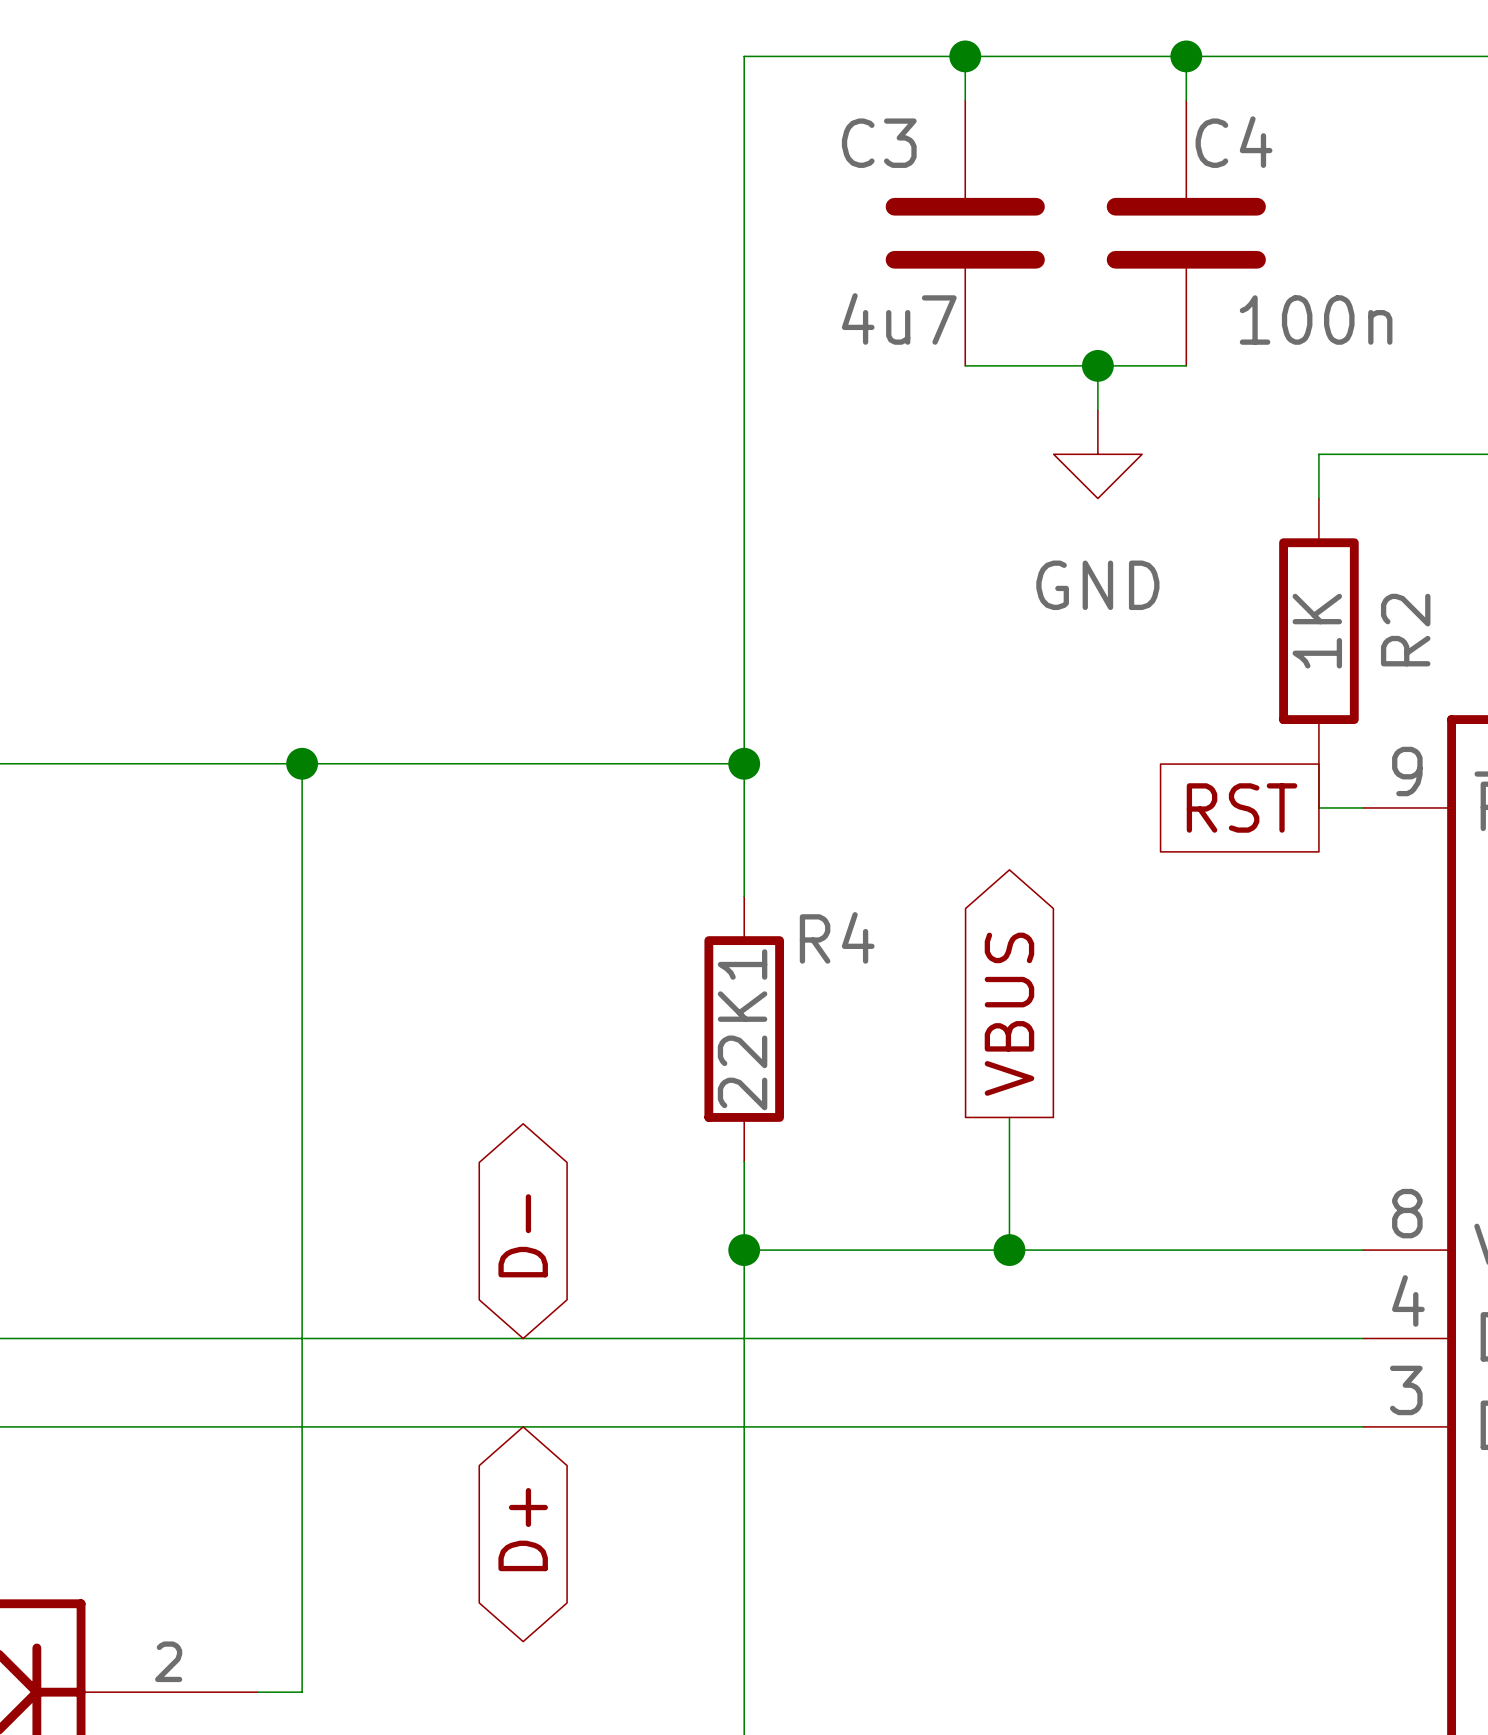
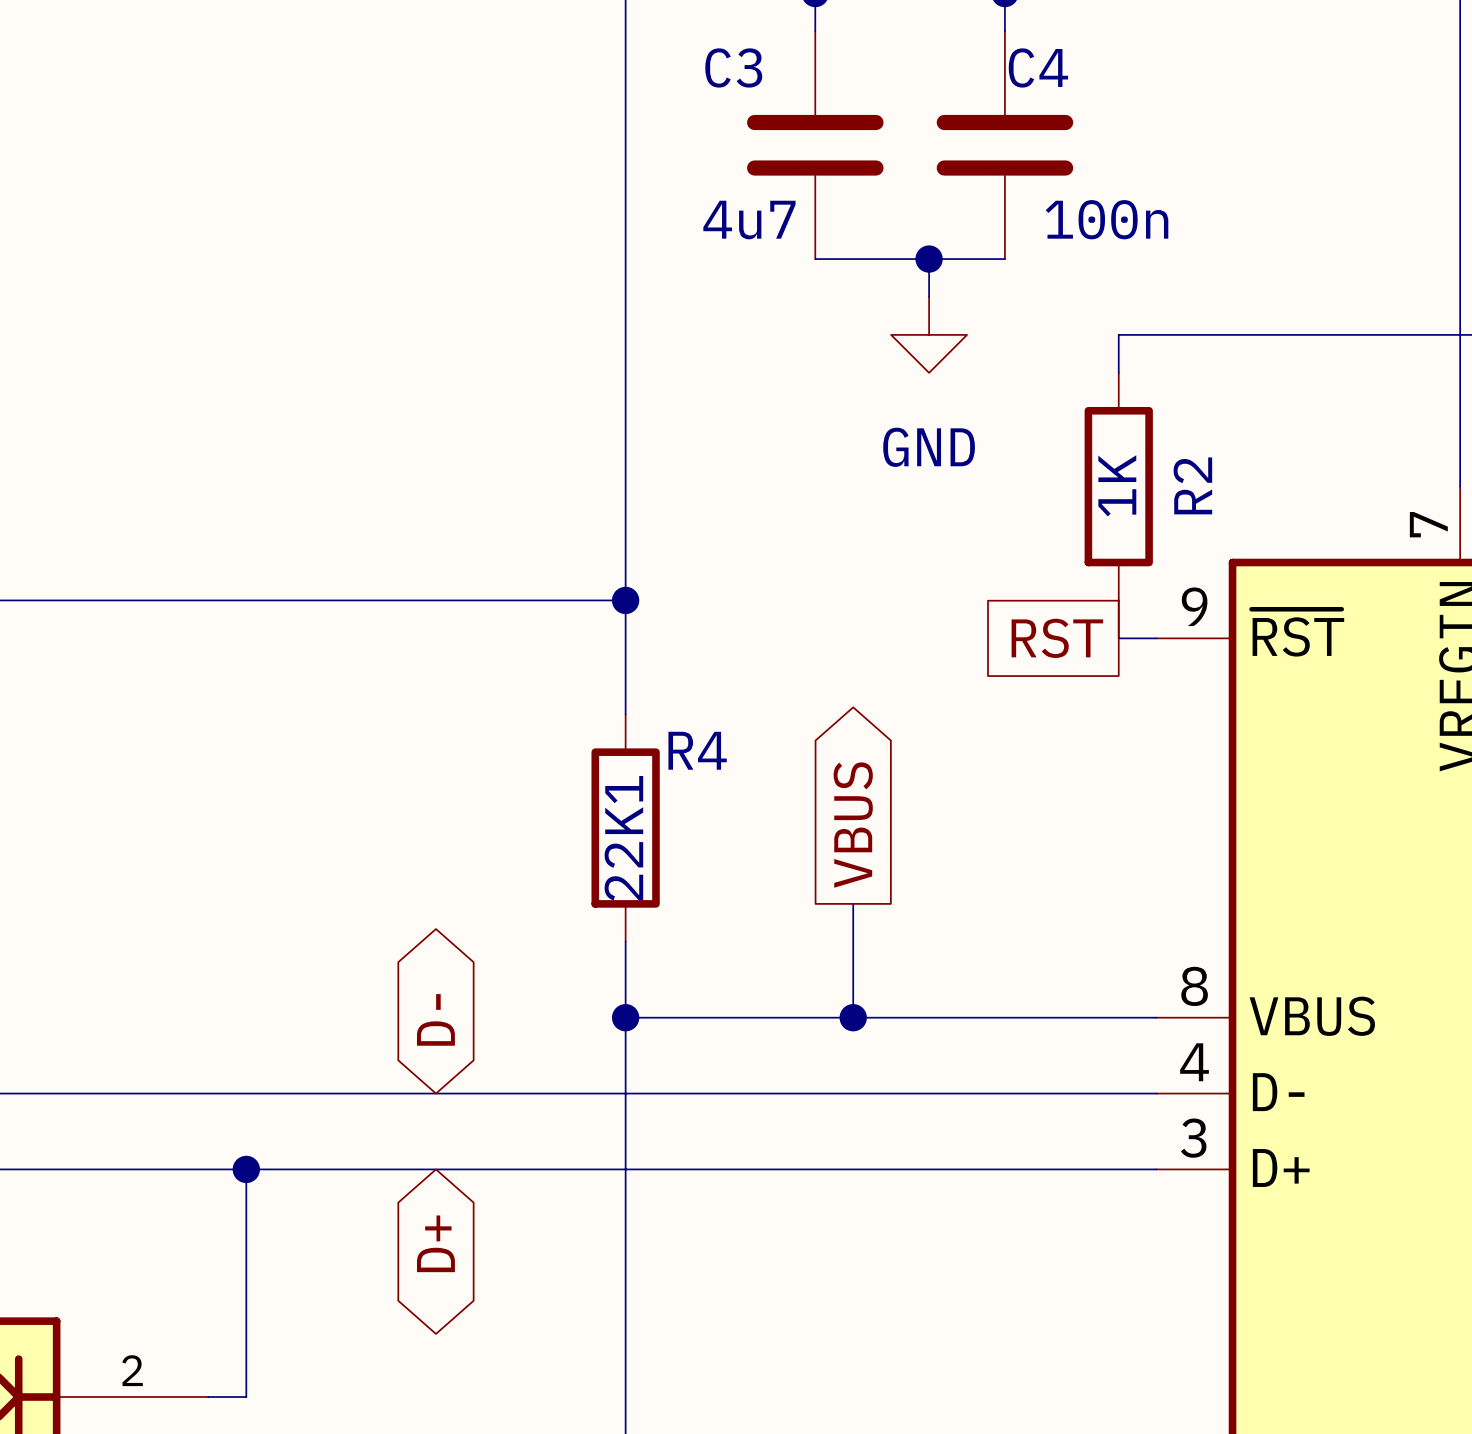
wire: (302, 763) (302, 1426) -> none
junction: (302, 763) -> none
junction: none -> (246, 1169)

